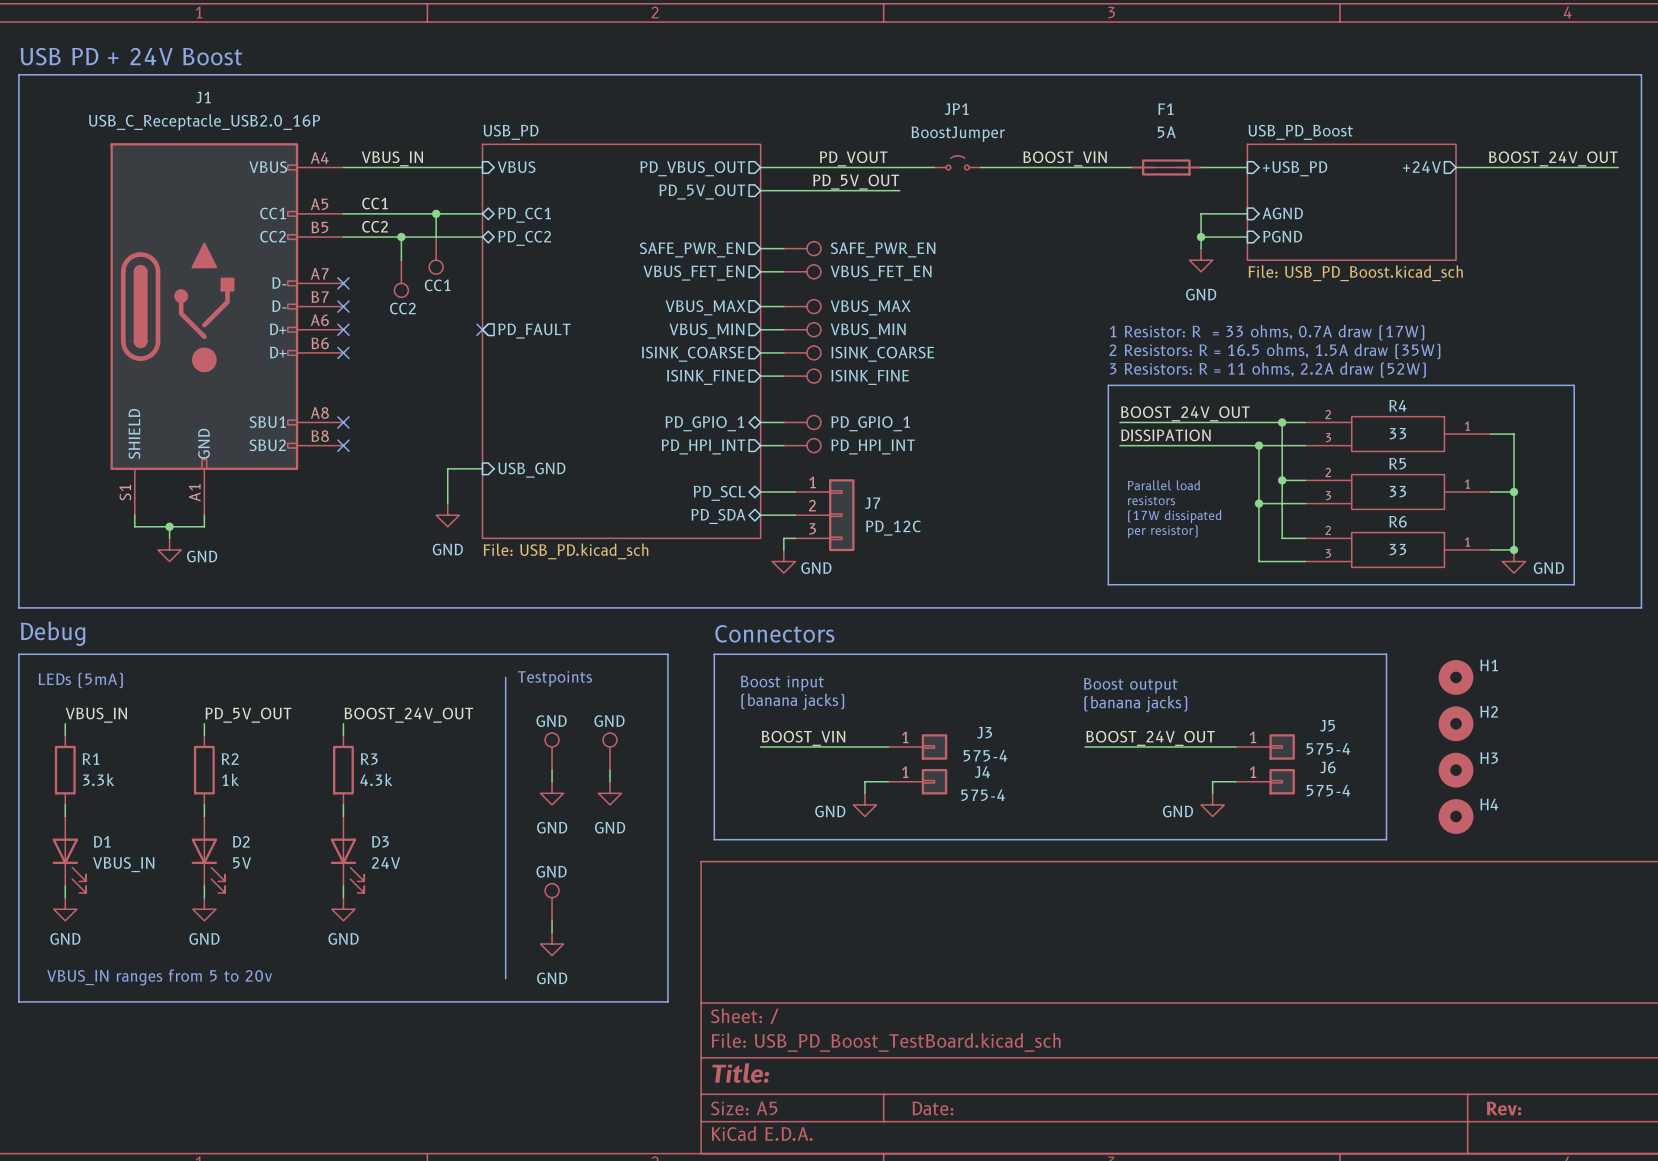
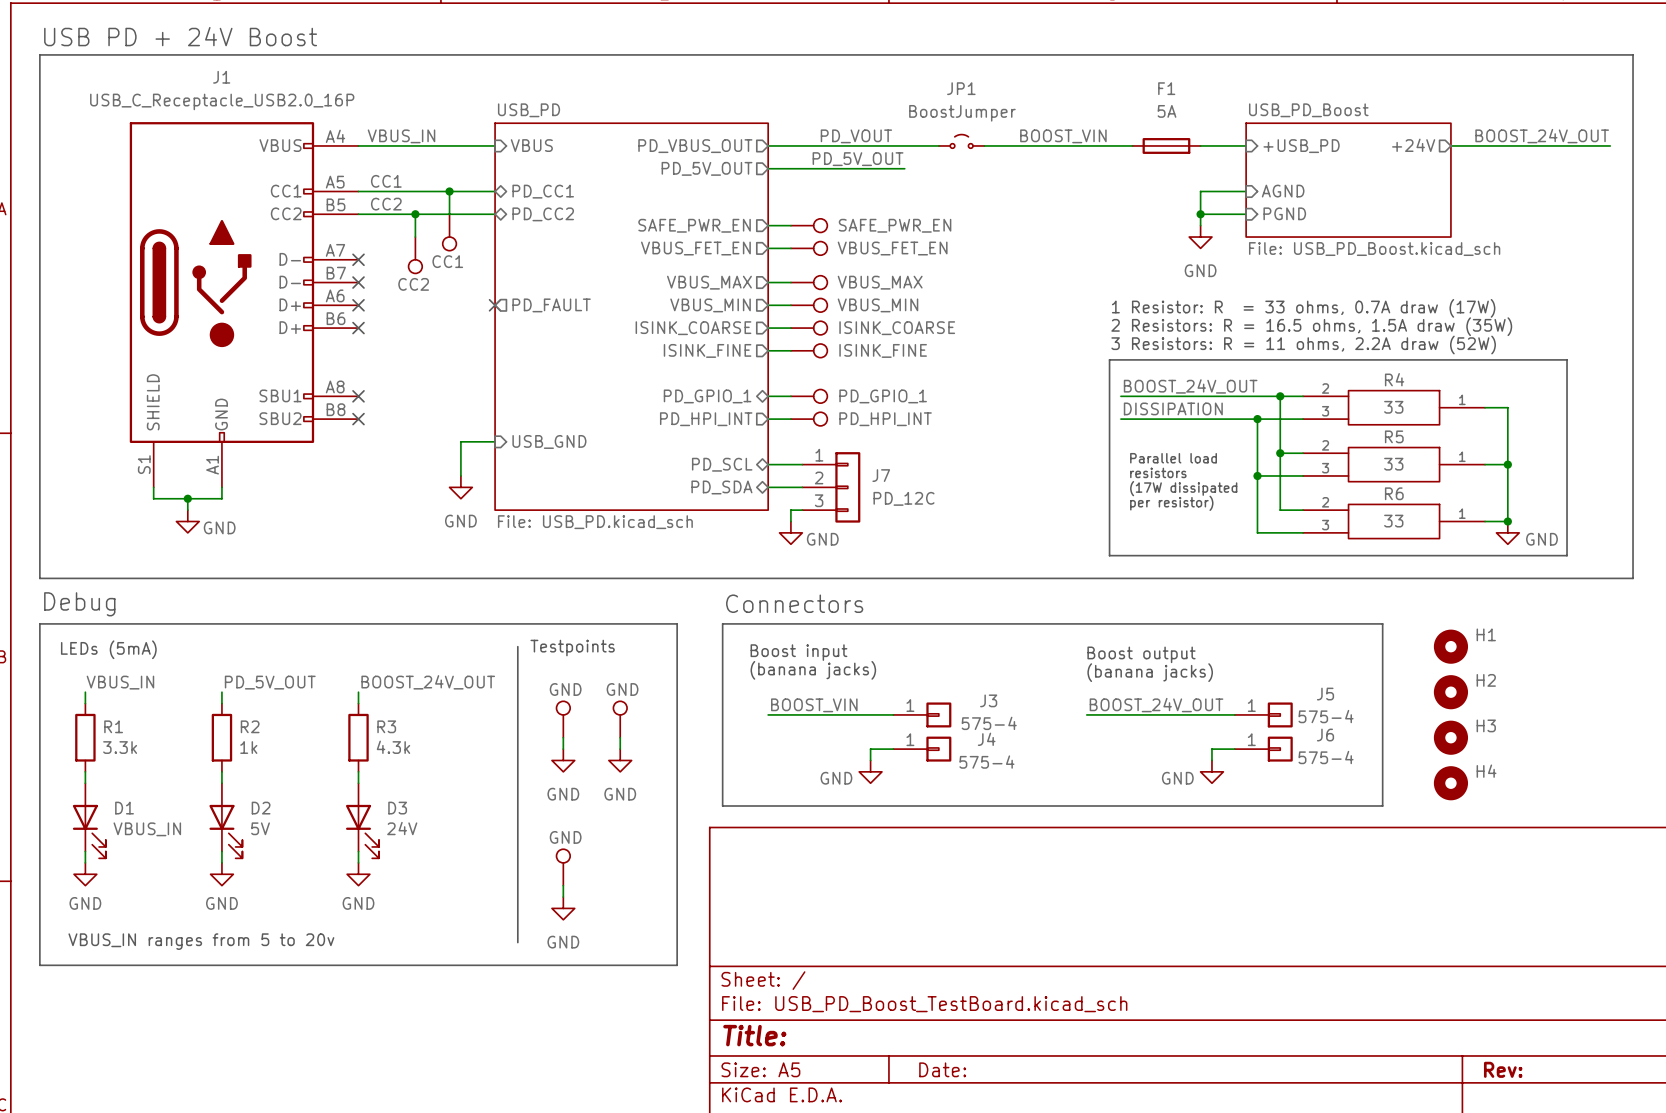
F1 symbol: [1131, 159, 1202, 176] -> [1132, 138, 1201, 154]

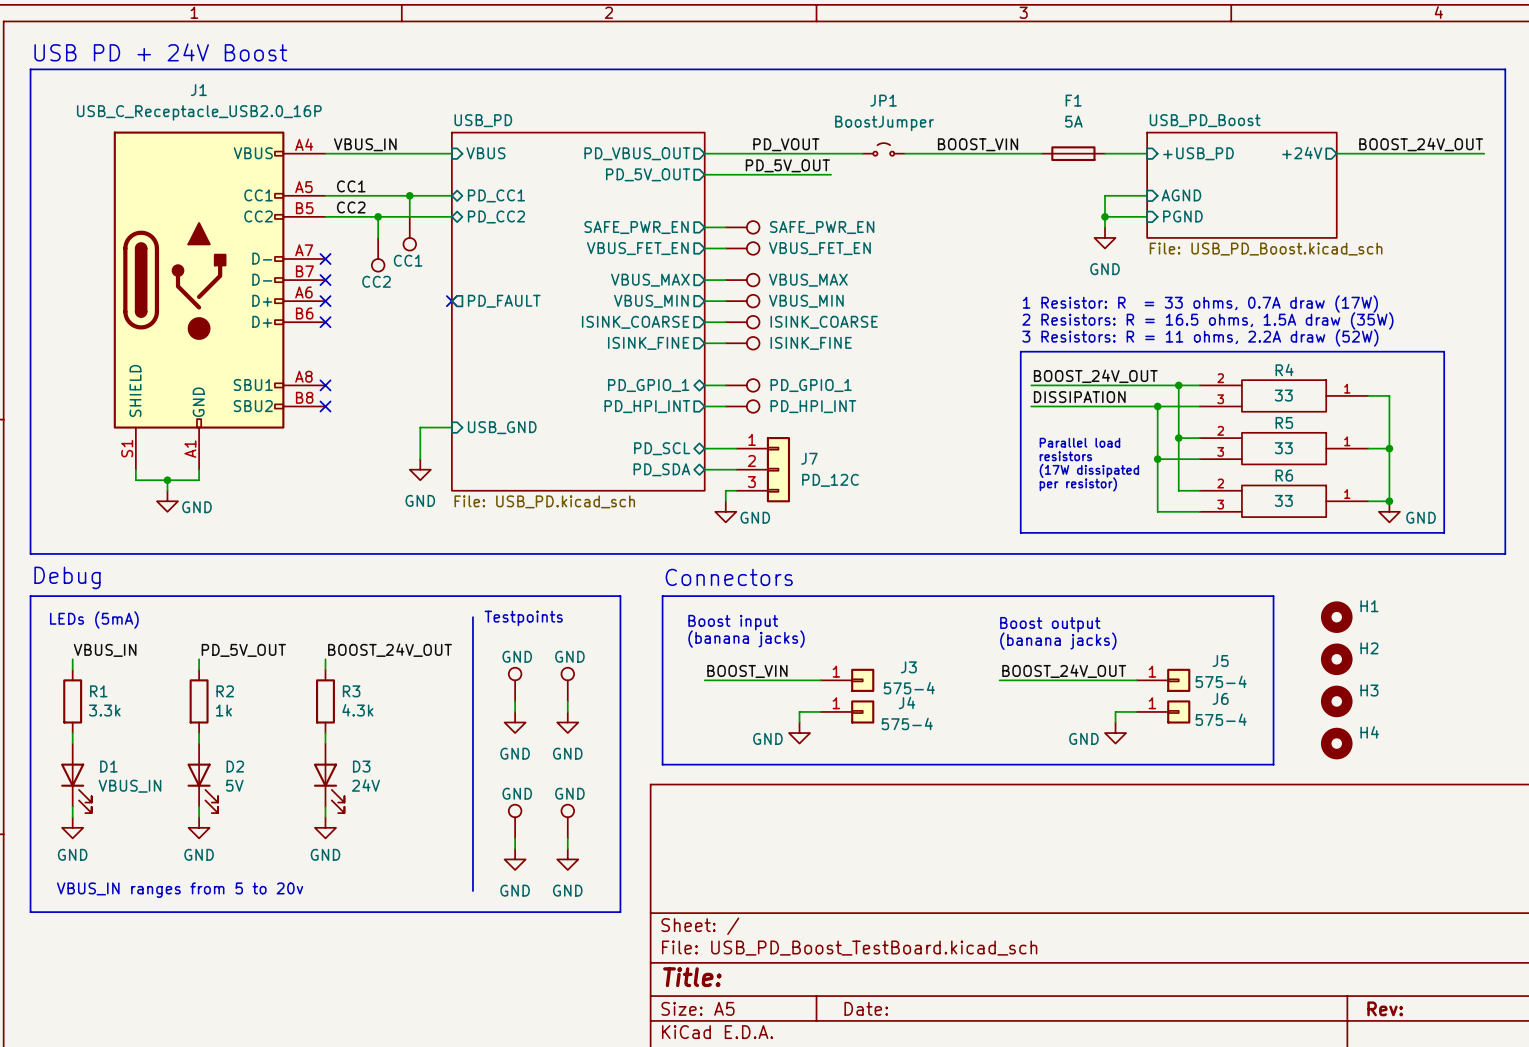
part: none -> GND (567, 821)
wire: none -> (567, 838) (567, 848)
power symbol: none -> GND (567, 859)

